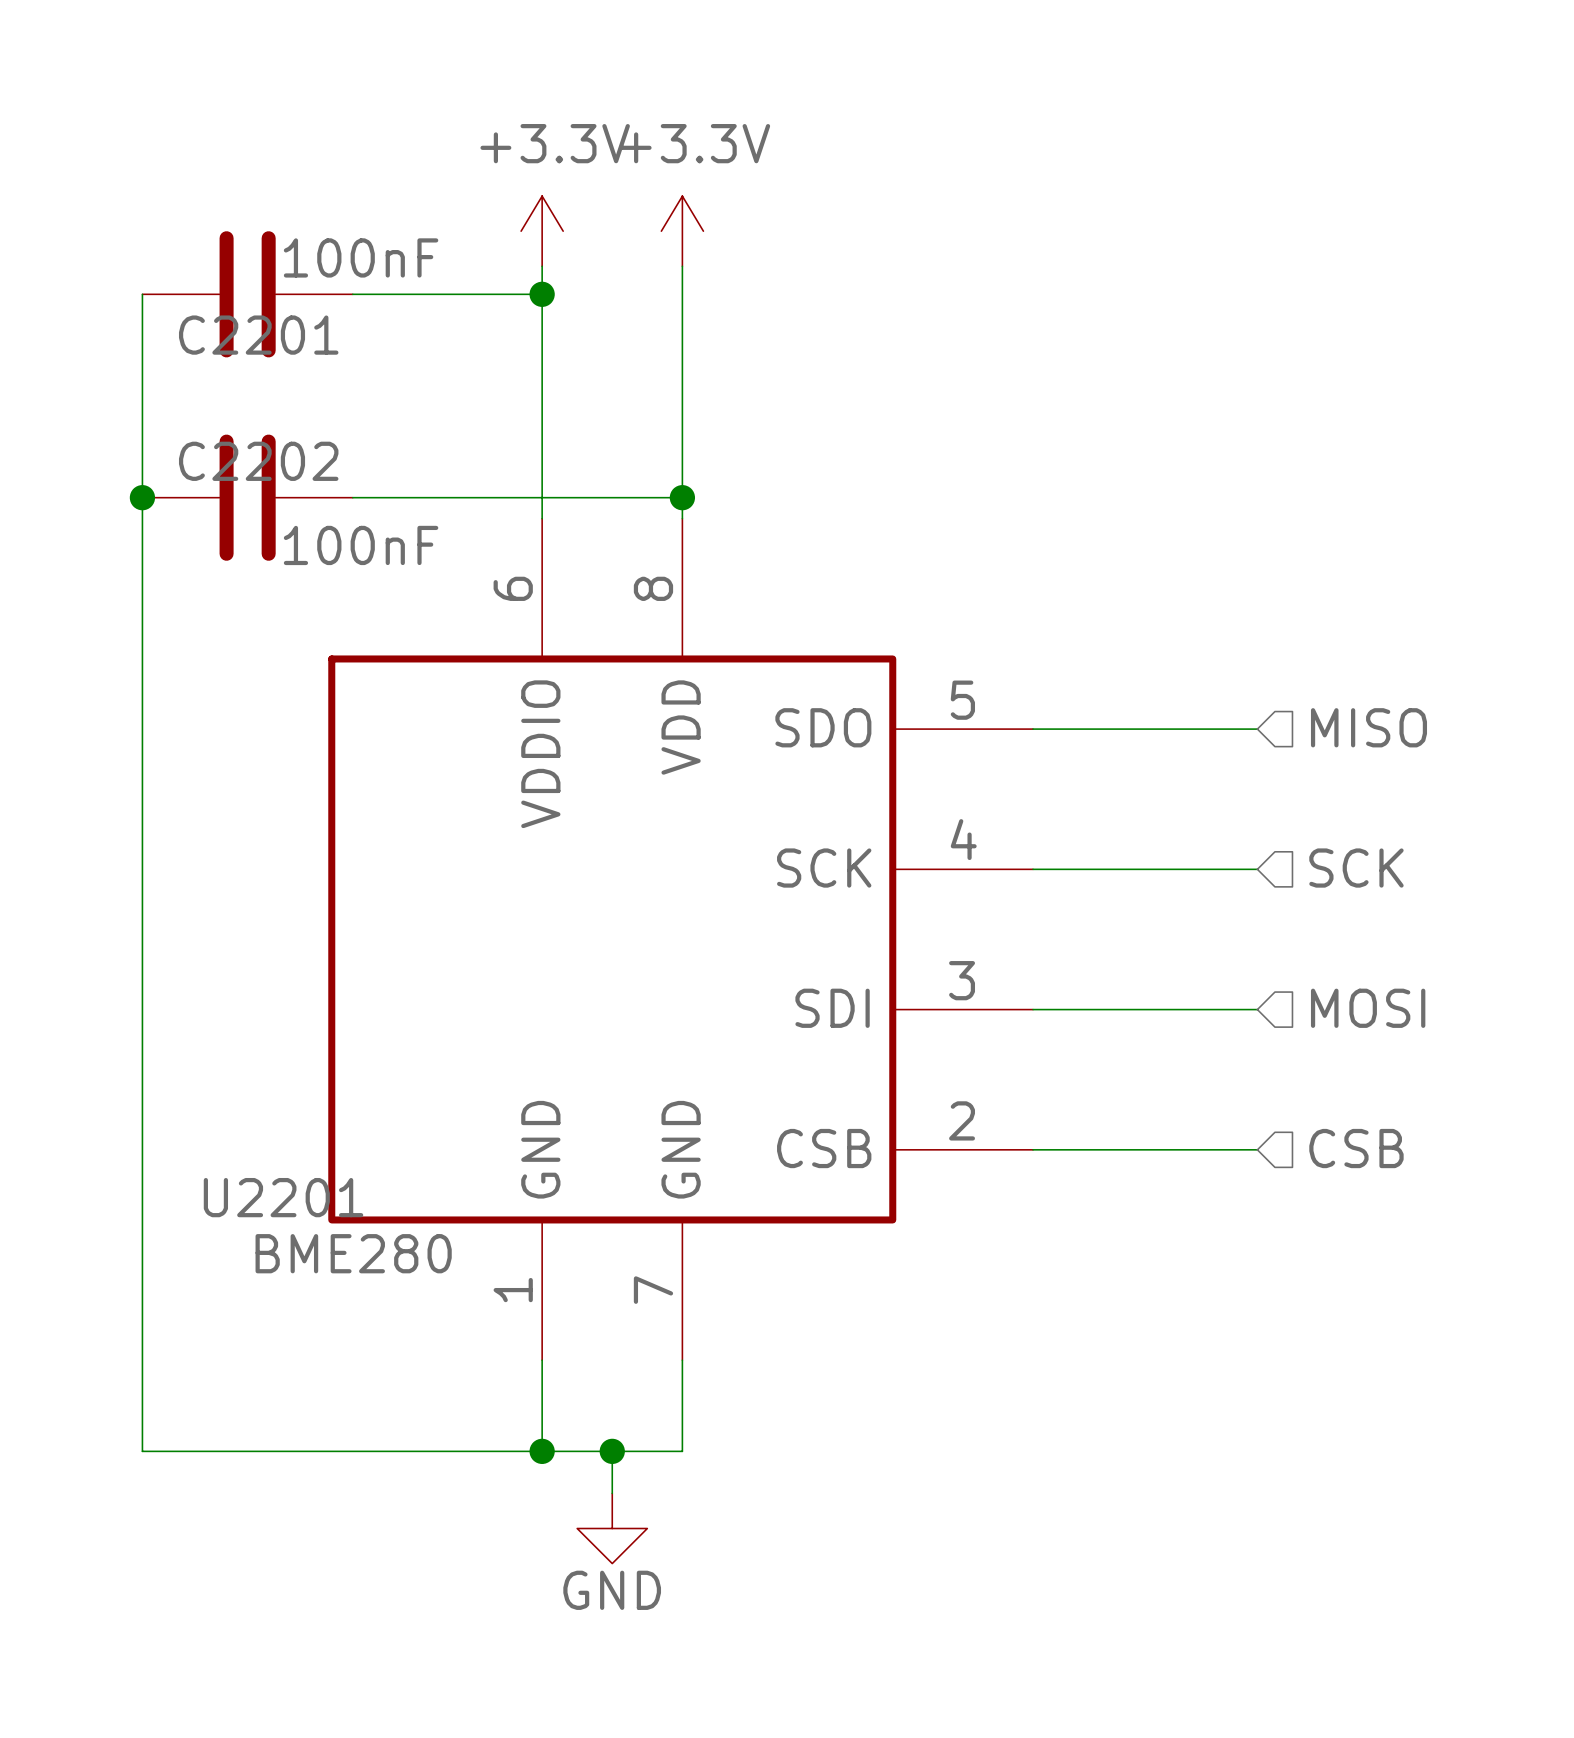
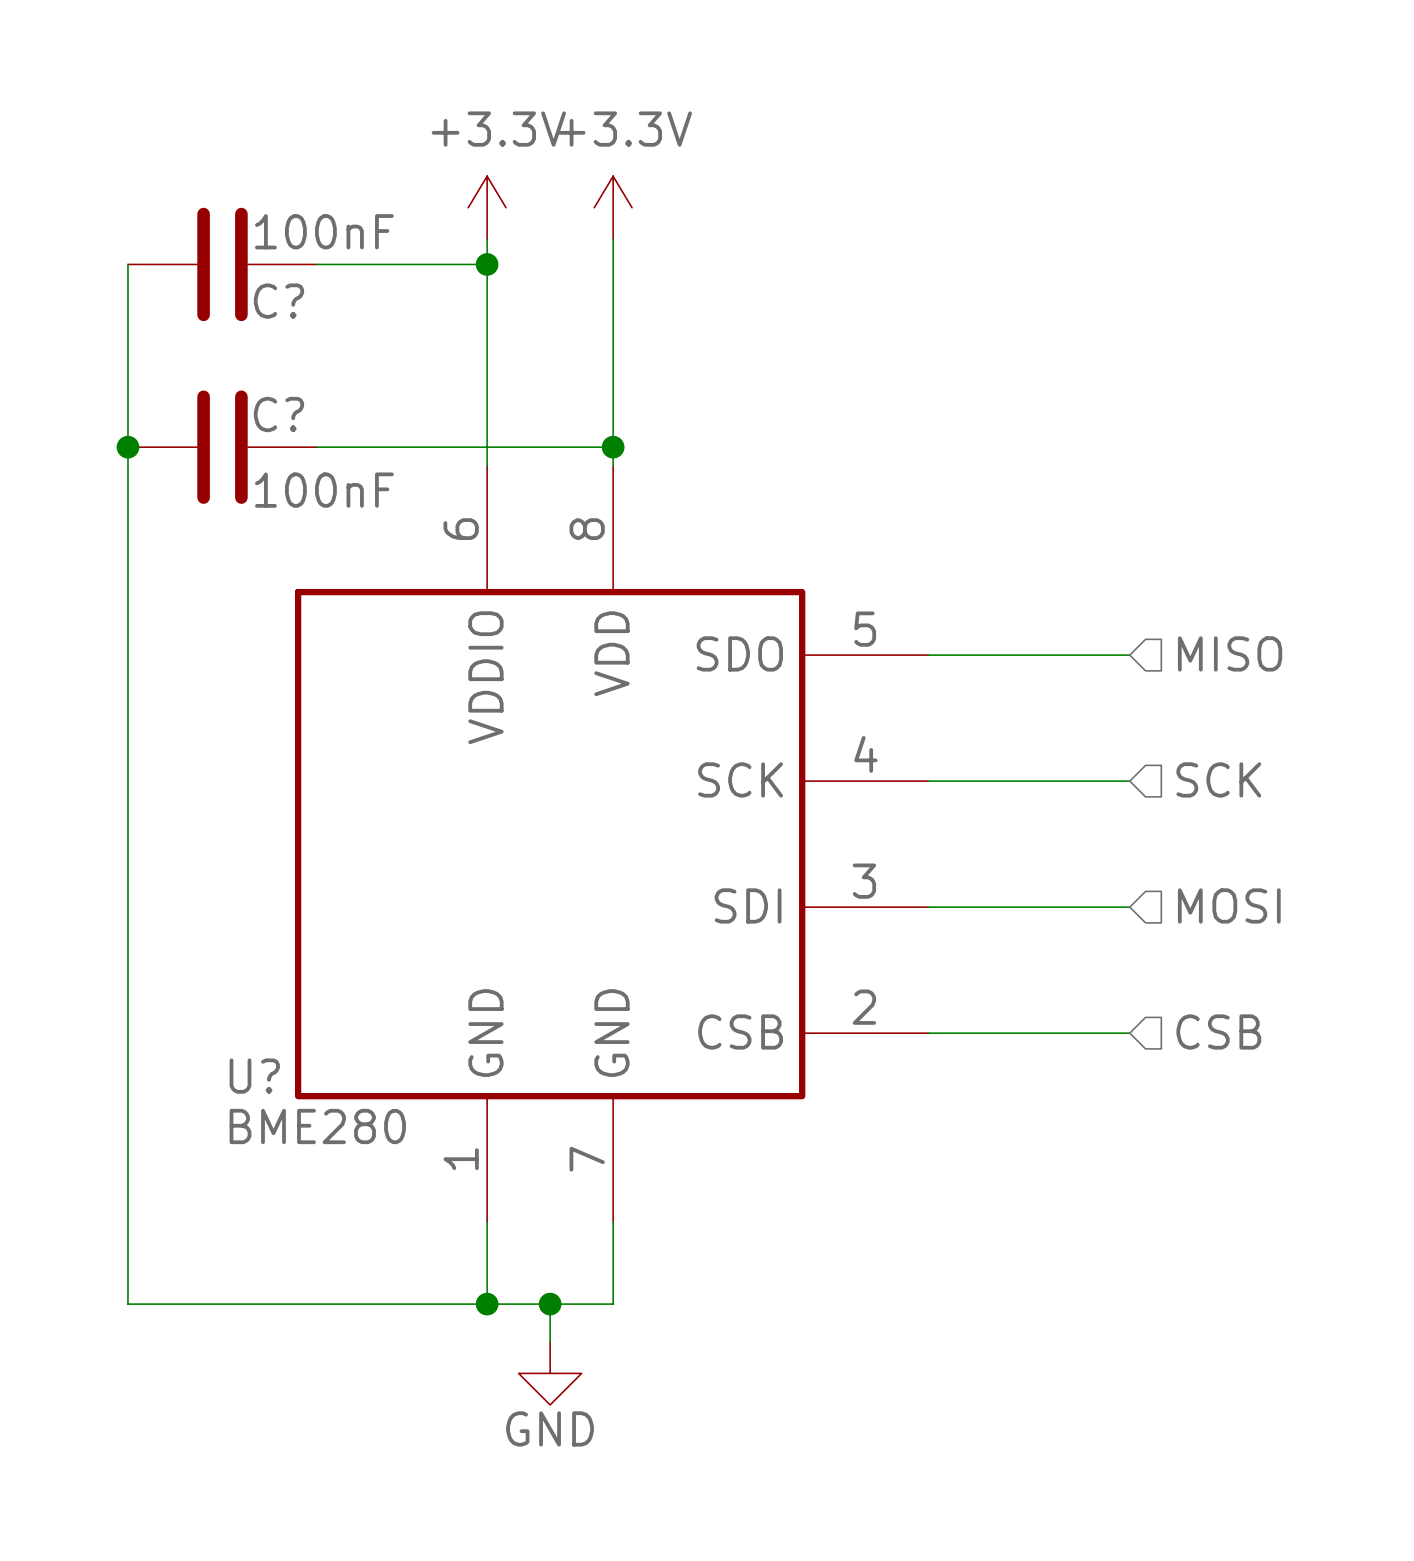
C2201 name: C2201 (258, 335) -> C? (278, 301)
C2202 name: C2202 (258, 461) -> C? (278, 414)
U2201 name: U2201 (283, 1197) -> U? (254, 1076)

